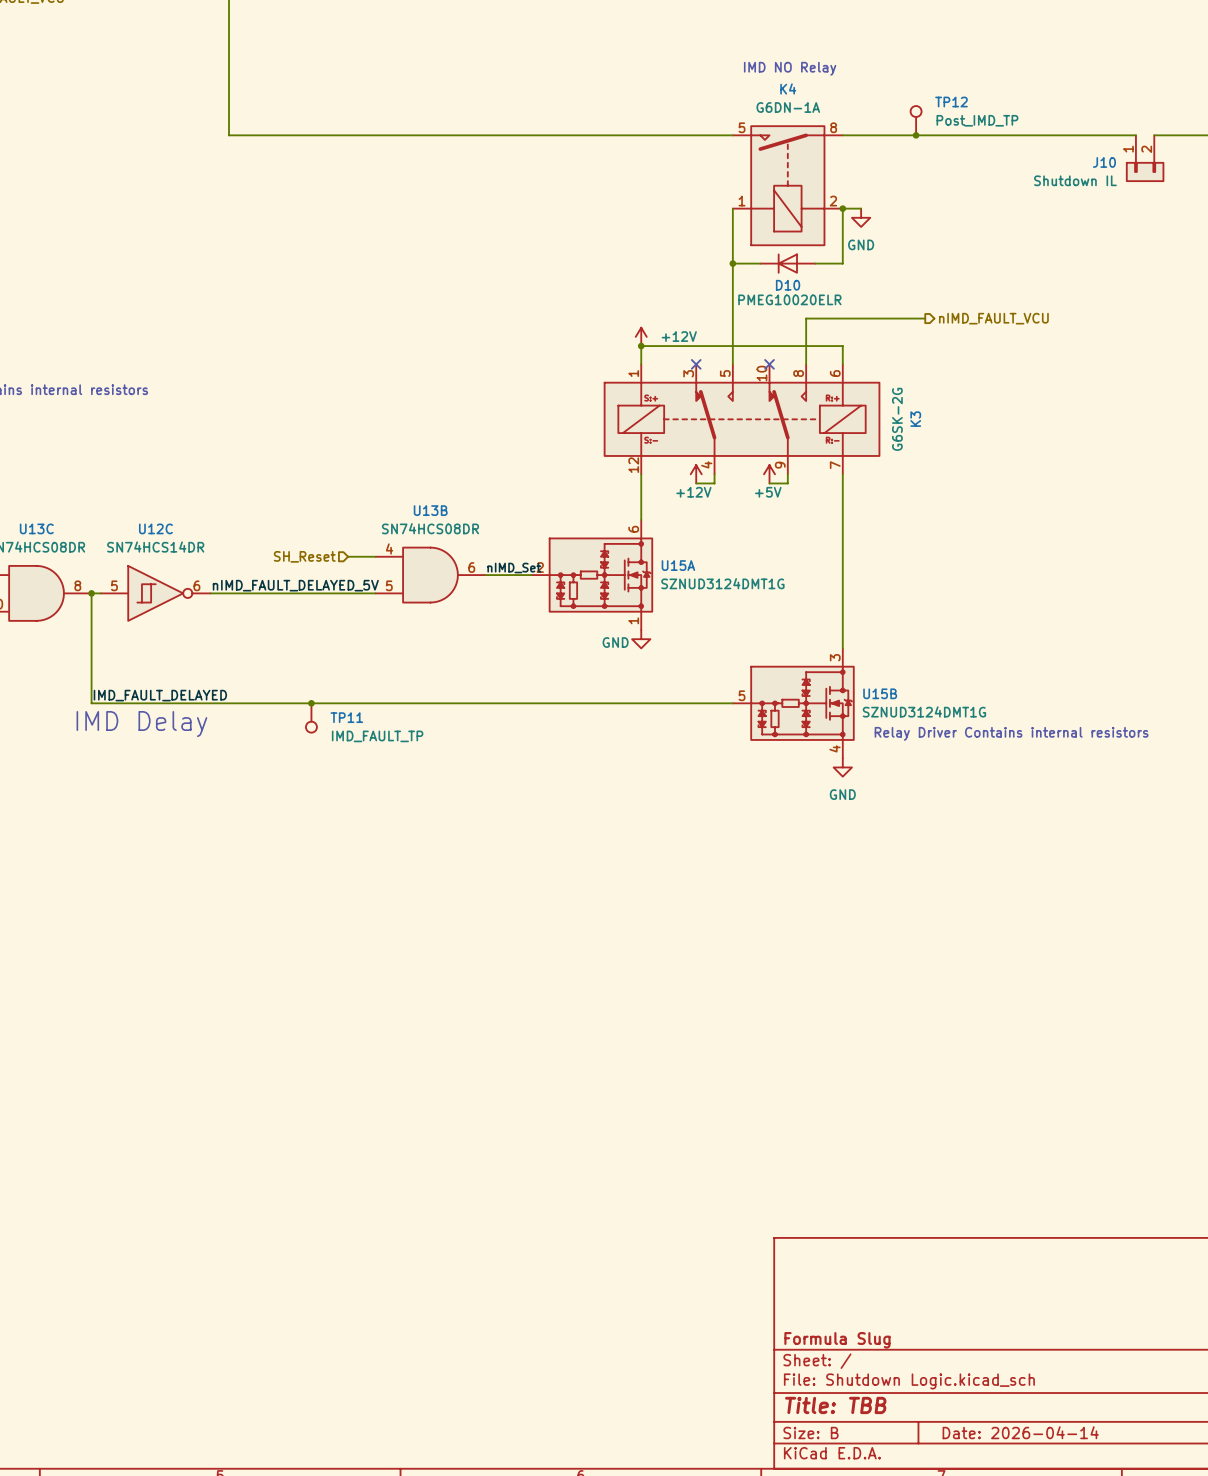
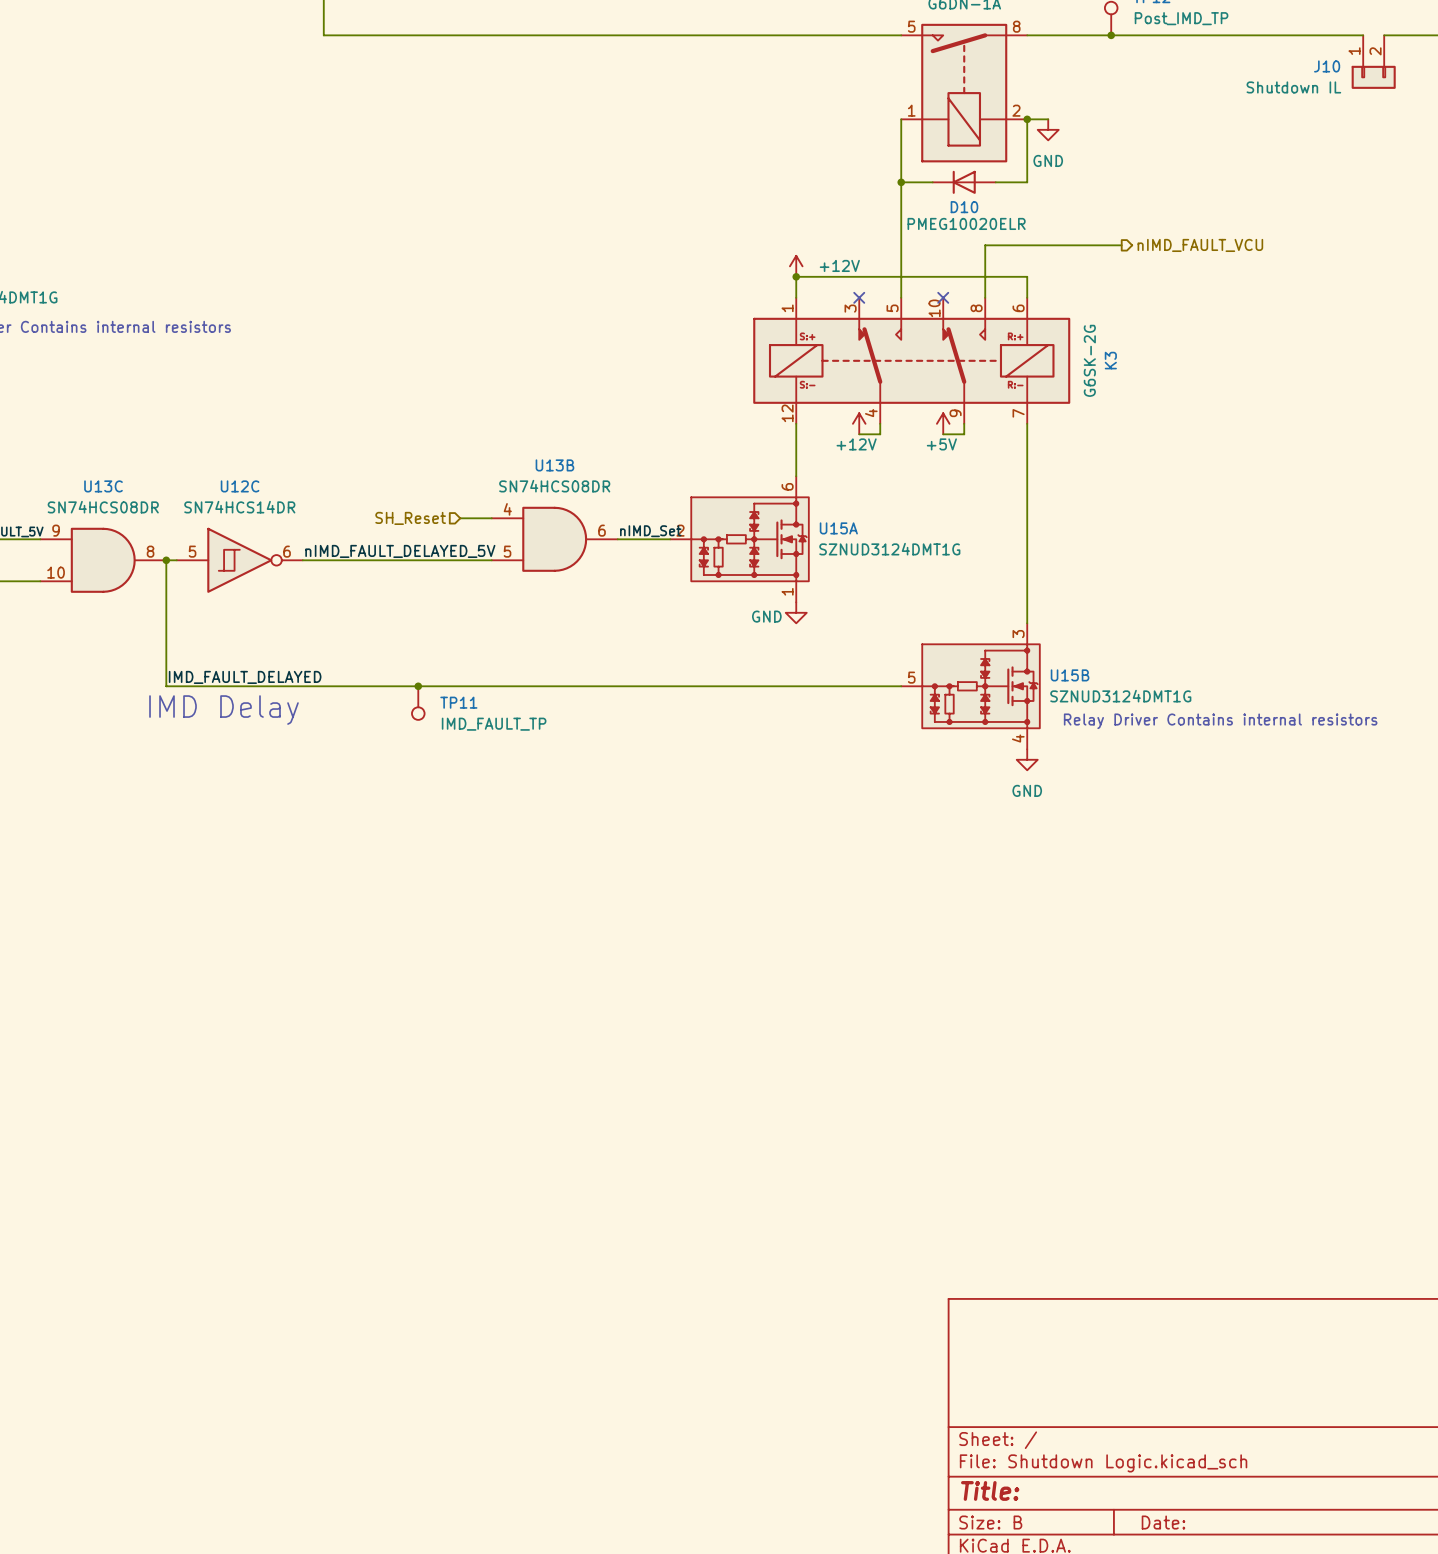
title block: Formula Slug (837, 1340) -> none
title block: Title: TBB (835, 1405) -> Title: (990, 1490)
title block: Date: 2026-04-14 (1020, 1432) -> Date: (1163, 1522)

